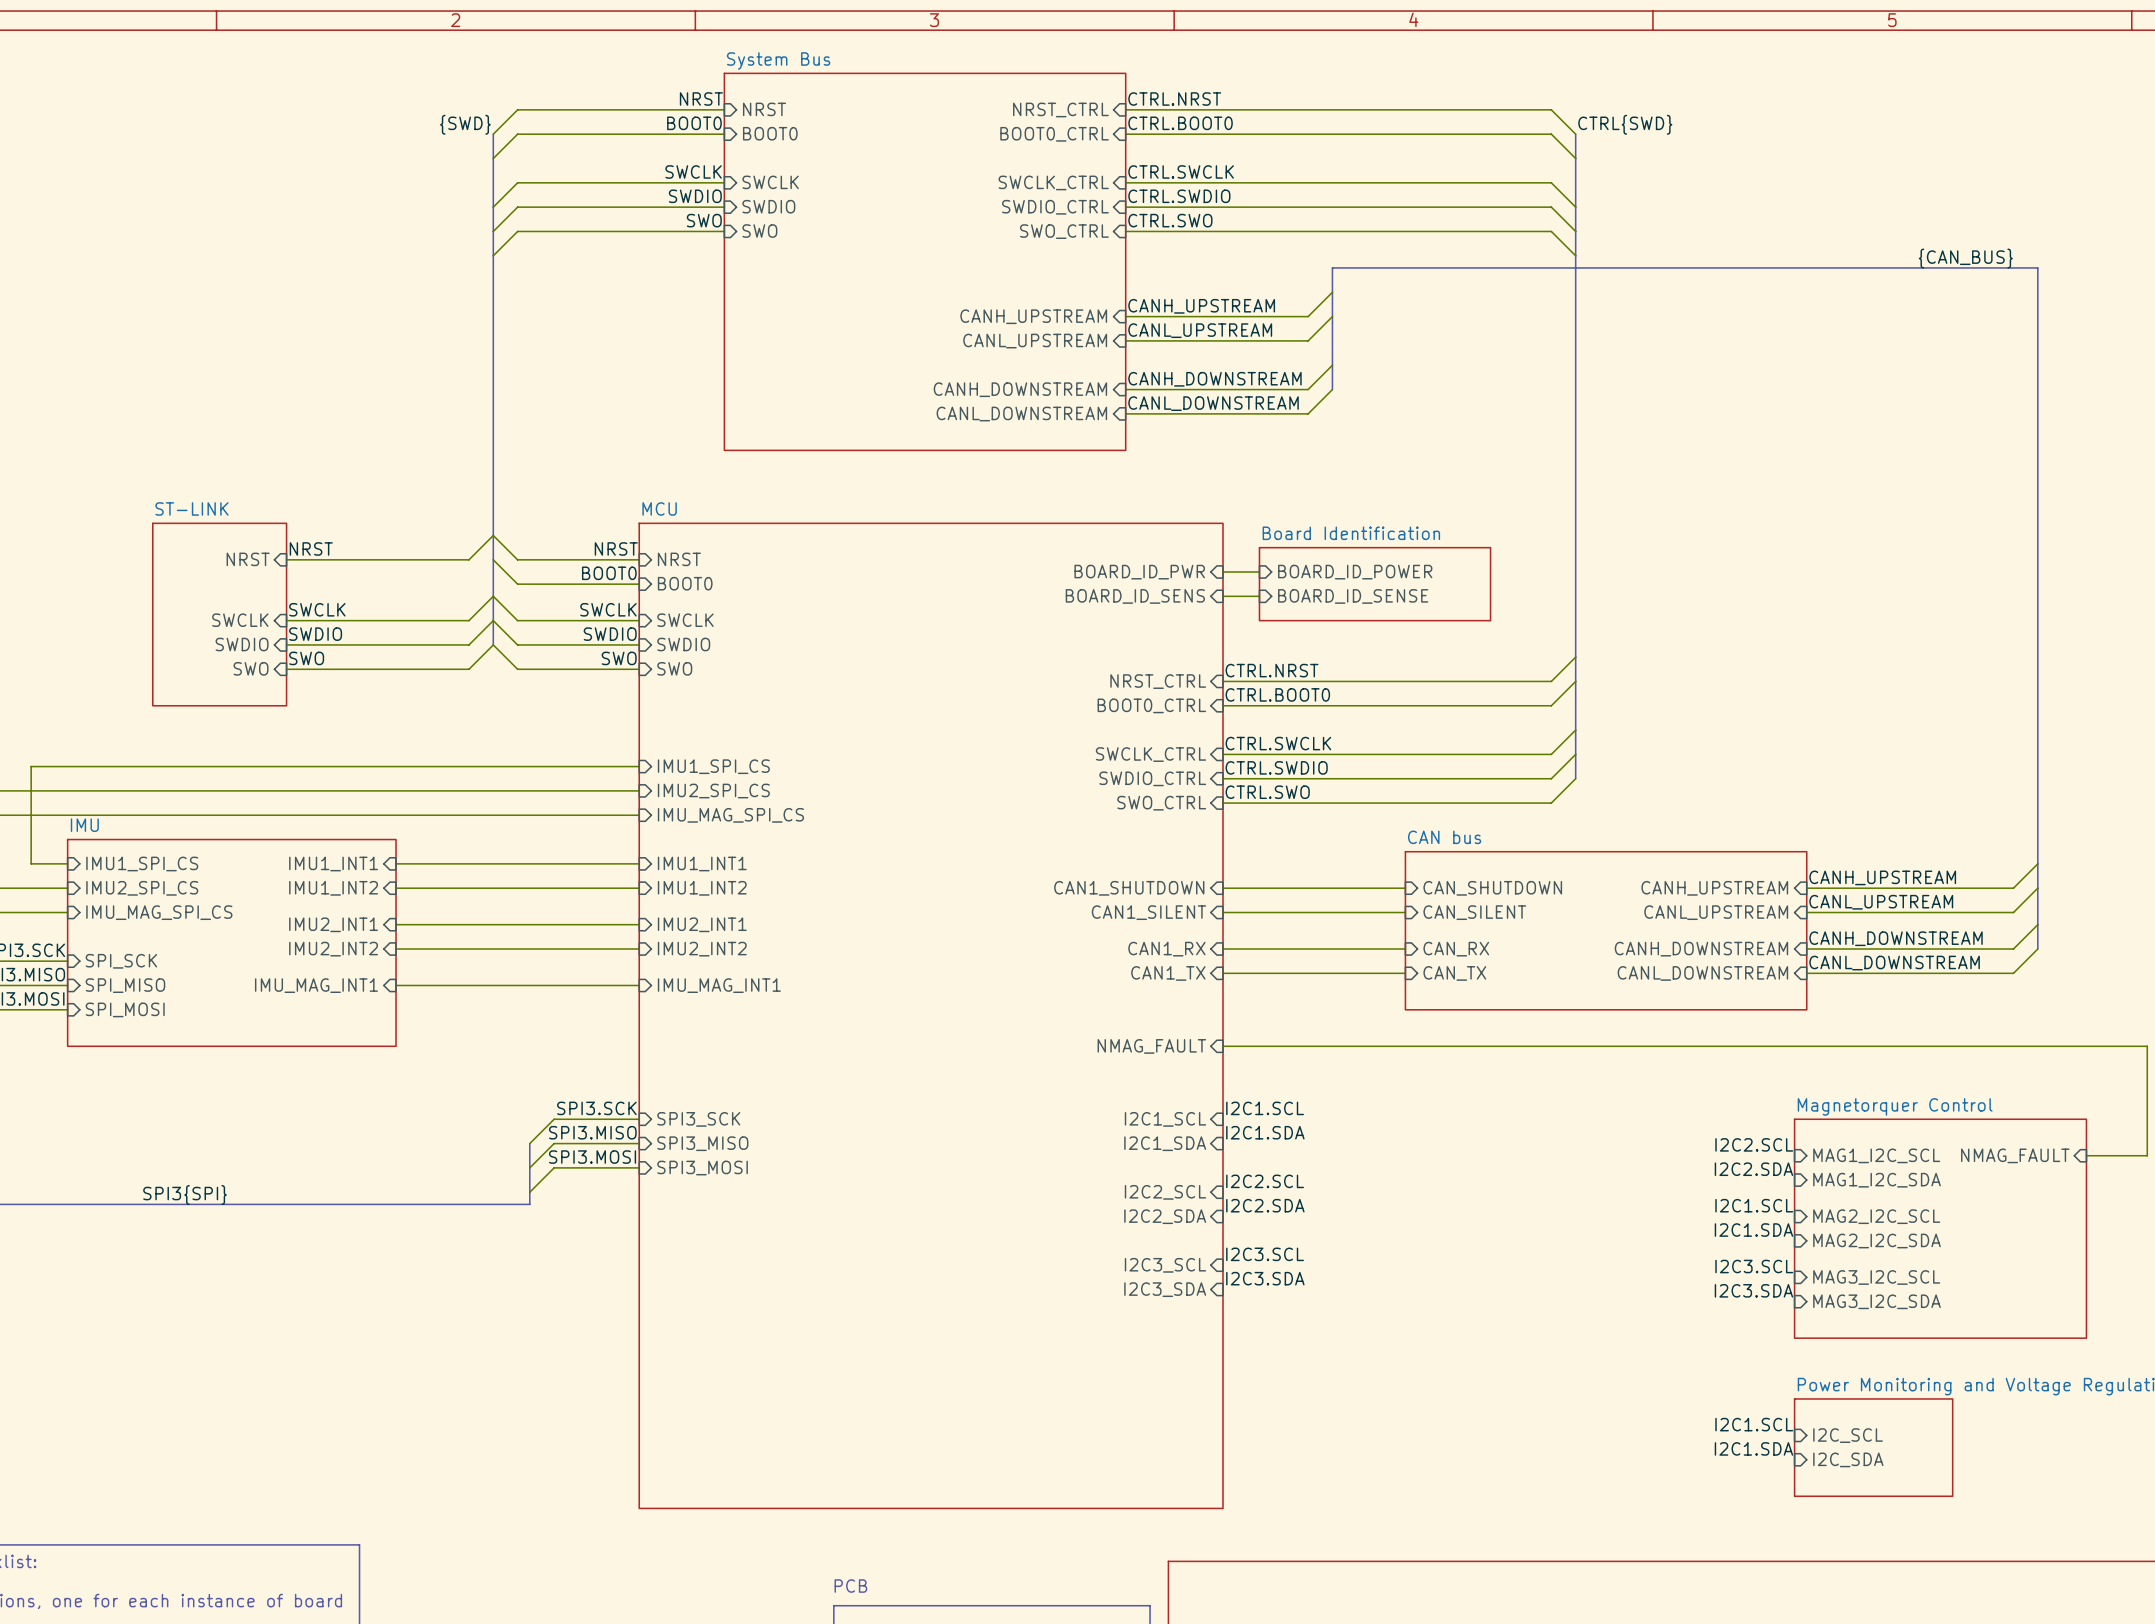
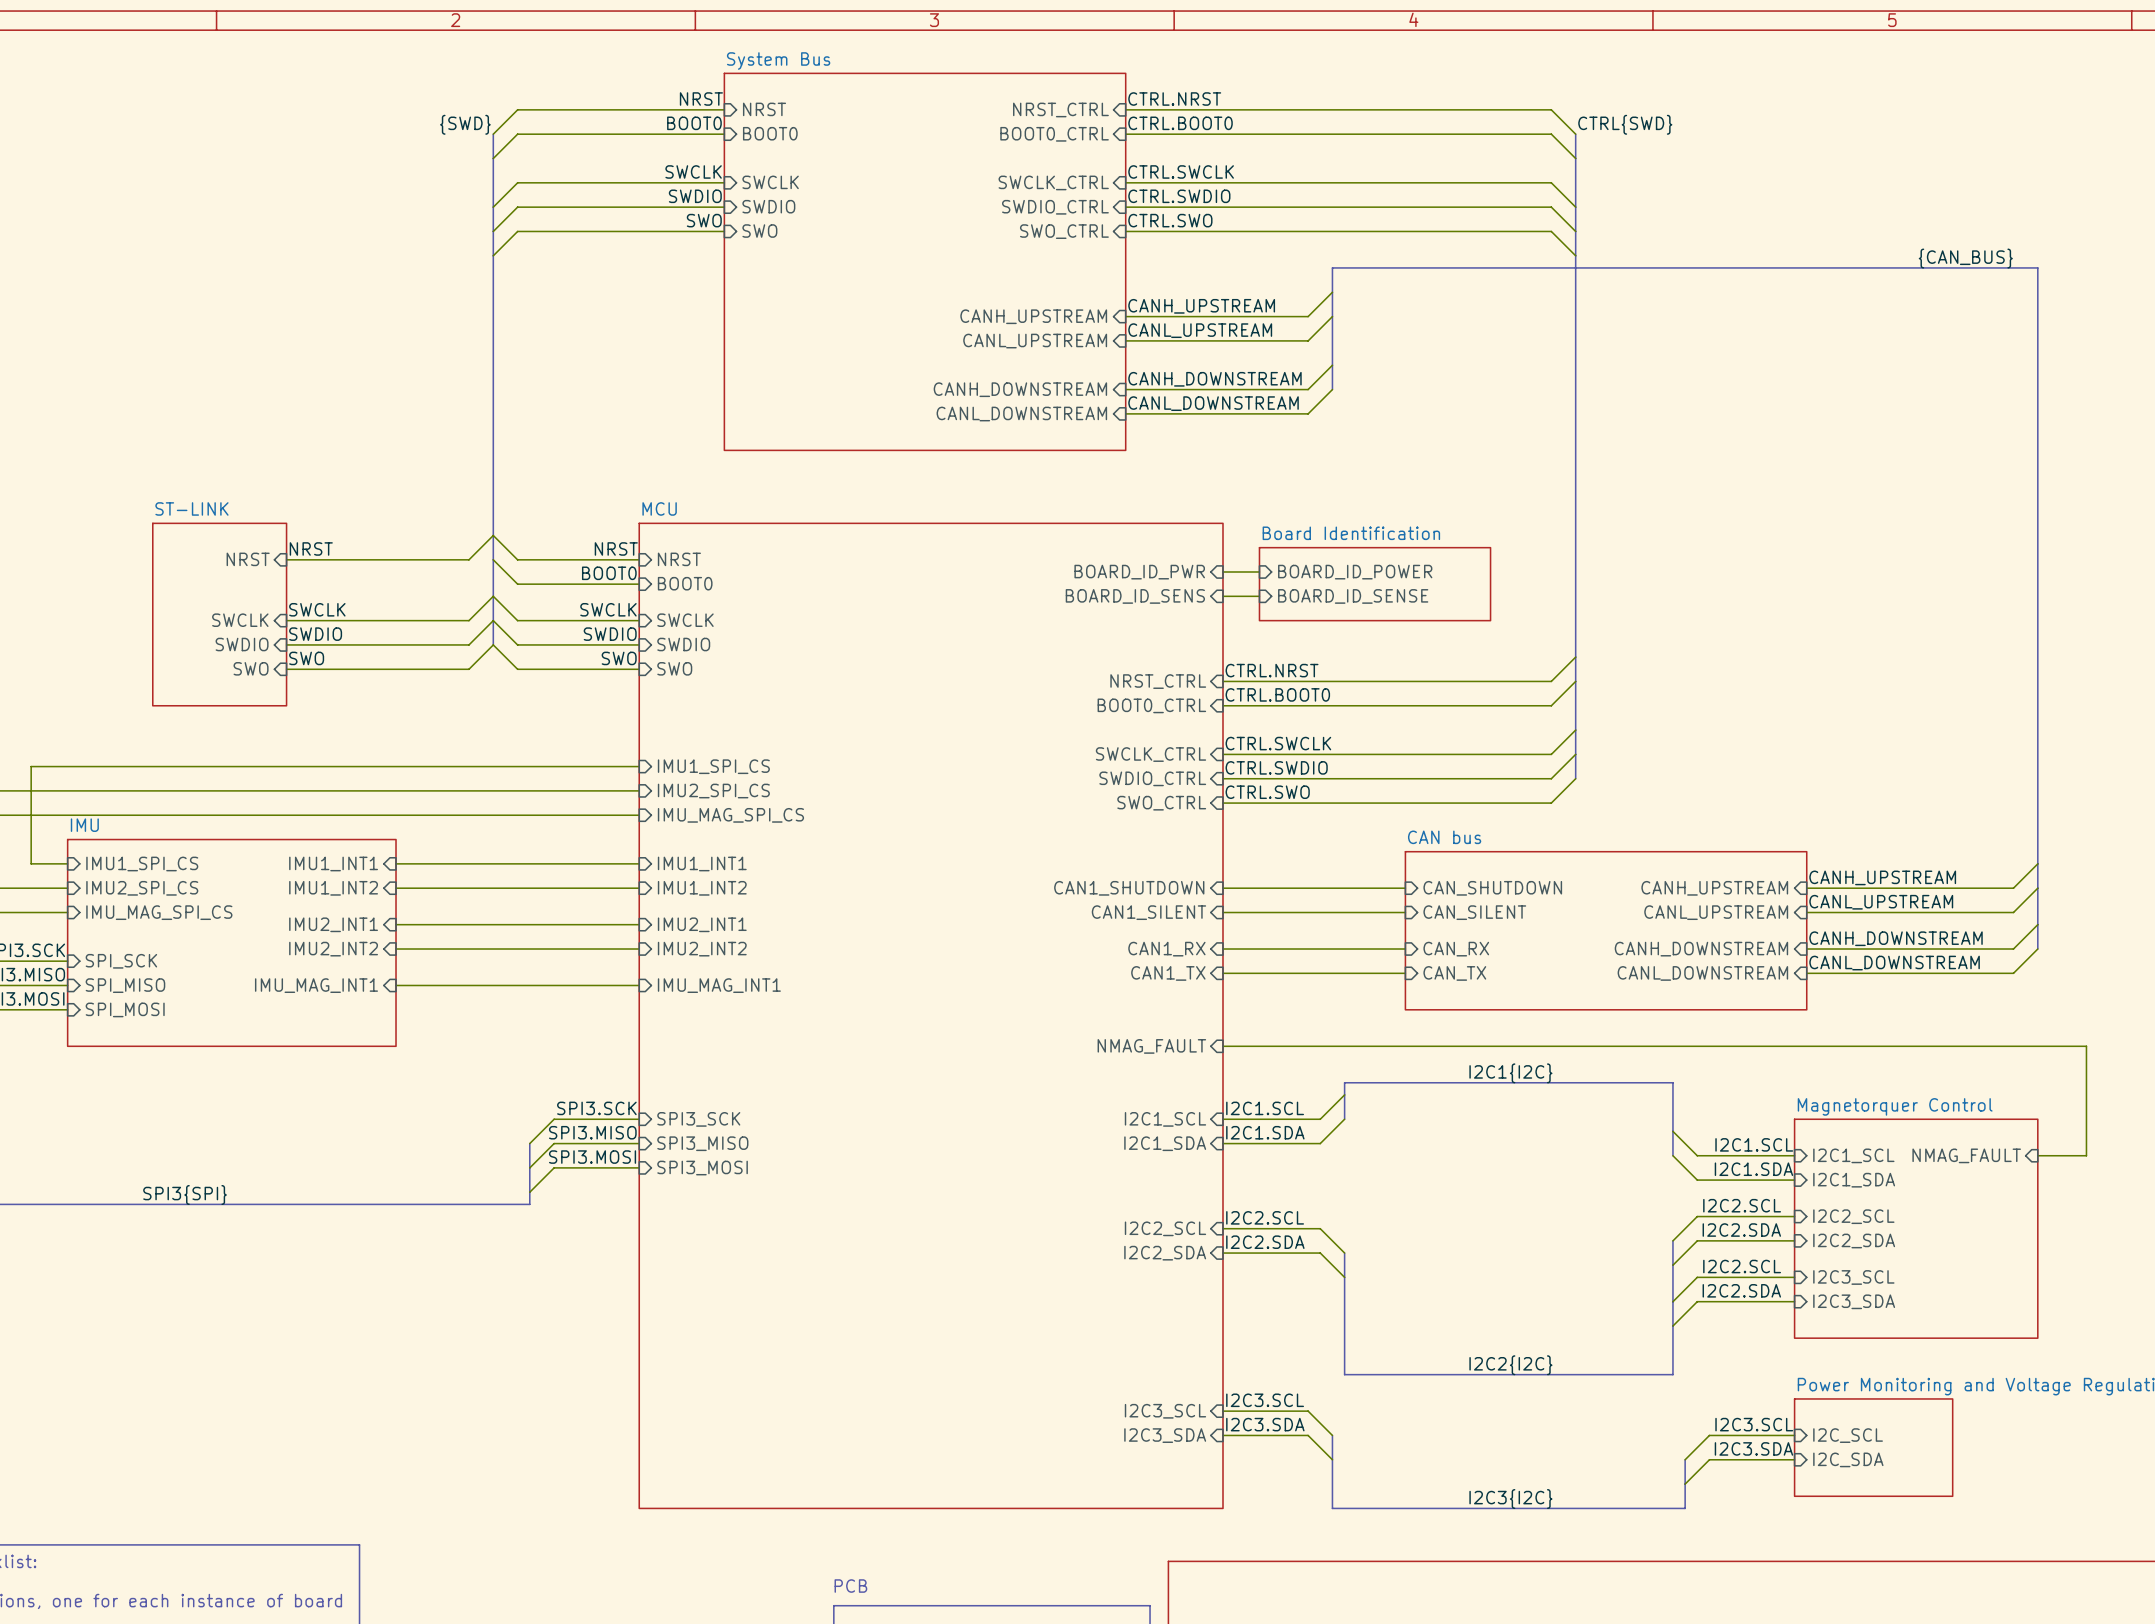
wire: (2086, 1046) (2147, 1046) (2147, 1155) (2086, 1155) -> (2086, 1046) (2086, 1155) (2037, 1155)
label: none -> I2C1{I2C} (1510, 1073)
wire: none -> (1344, 1094) (1320, 1119) (1222, 1119)
wire: none -> (1344, 1119) (1320, 1143) (1222, 1143)
bus: none -> (1344, 1119) (1344, 1082) (1672, 1082) (1672, 1155)
wire: none -> (1672, 1131) (1697, 1155) (1794, 1155)
label: I2C2.SCL (1754, 1144) -> I2C1.SCL (1754, 1144)
wire: none -> (1672, 1155) (1697, 1180) (1794, 1180)
sheet pin: MAG1_I2C_SCL (1876, 1155) -> I2C1_SCL (1853, 1155)
sheet pin position: NMAG_FAULT (2015, 1155) -> NMAG_FAULT (1966, 1155)
label: I2C2.SDA (1753, 1169) -> I2C1.SDA (1753, 1169)
sheet pin: MAG1_I2C_SDA (1877, 1180) -> I2C1_SDA (1854, 1180)
label position: I2C2.SCL (1265, 1181) -> I2C2.SCL (1265, 1217)
sheet pin position: I2C2_SCL (1165, 1192) -> I2C2_SCL (1165, 1228)
label position: I2C2.SDA (1265, 1205) -> I2C2.SDA (1265, 1242)
label: I2C1.SCL (1754, 1205) -> I2C2.SCL (1742, 1205)
sheet pin position: I2C2_SDA (1165, 1216) -> I2C2_SDA (1165, 1253)
wire: none -> (1794, 1216) (1697, 1216) (1672, 1240)
sheet pin: MAG2_I2C_SCL (1876, 1216) -> I2C2_SCL (1853, 1216)
wire: none -> (1222, 1228) (1320, 1228) (1344, 1253)
sheet Magnetorquer Control: none -> (1916, 1228)
sheet Magnetorquer Control: (1940, 1228) -> none
label: I2C1.SDA (1753, 1230) -> I2C2.SDA (1741, 1230)
bus: none -> (1672, 1240) (1672, 1374) (1344, 1374) (1344, 1253)
wire: none -> (1794, 1240) (1697, 1240) (1672, 1265)
sheet pin: MAG2_I2C_SDA (1877, 1241) -> I2C2_SDA (1854, 1241)
wire: none -> (1222, 1253) (1320, 1253) (1344, 1277)
label position: I2C3.SCL (1265, 1254) -> I2C3.SCL (1265, 1400)
sheet pin position: I2C3_SCL (1165, 1265) -> I2C3_SCL (1165, 1411)
label: I2C3.SCL (1754, 1266) -> I2C2.SCL (1742, 1266)
wire: none -> (1794, 1277) (1697, 1277) (1672, 1301)
sheet pin: MAG3_I2C_SCL (1876, 1277) -> I2C3_SCL (1853, 1277)
label position: I2C3.SDA (1265, 1278) -> I2C3.SDA (1265, 1424)
sheet pin position: I2C3_SDA (1165, 1289) -> I2C3_SDA (1165, 1435)
label: I2C3.SDA (1753, 1290) -> I2C2.SDA (1741, 1290)
wire: none -> (1794, 1301) (1697, 1301) (1672, 1326)
sheet pin: MAG3_I2C_SDA (1877, 1301) -> I2C3_SDA (1854, 1301)
label: none -> I2C2{I2C} (1510, 1365)
wire: none -> (1222, 1411) (1308, 1411) (1332, 1435)
label: I2C1.SCL (1754, 1424) -> I2C3.SCL (1754, 1424)
wire: none -> (1222, 1435) (1308, 1435) (1332, 1459)
bus: none -> (1332, 1435) (1332, 1508) (1685, 1508) (1685, 1459)
wire: none -> (1794, 1435) (1709, 1435) (1685, 1459)
label: I2C1.SDA (1753, 1448) -> I2C3.SDA (1753, 1448)
wire: none -> (1794, 1459) (1709, 1459) (1685, 1484)
label: none -> I2C3{I2C} (1510, 1499)

